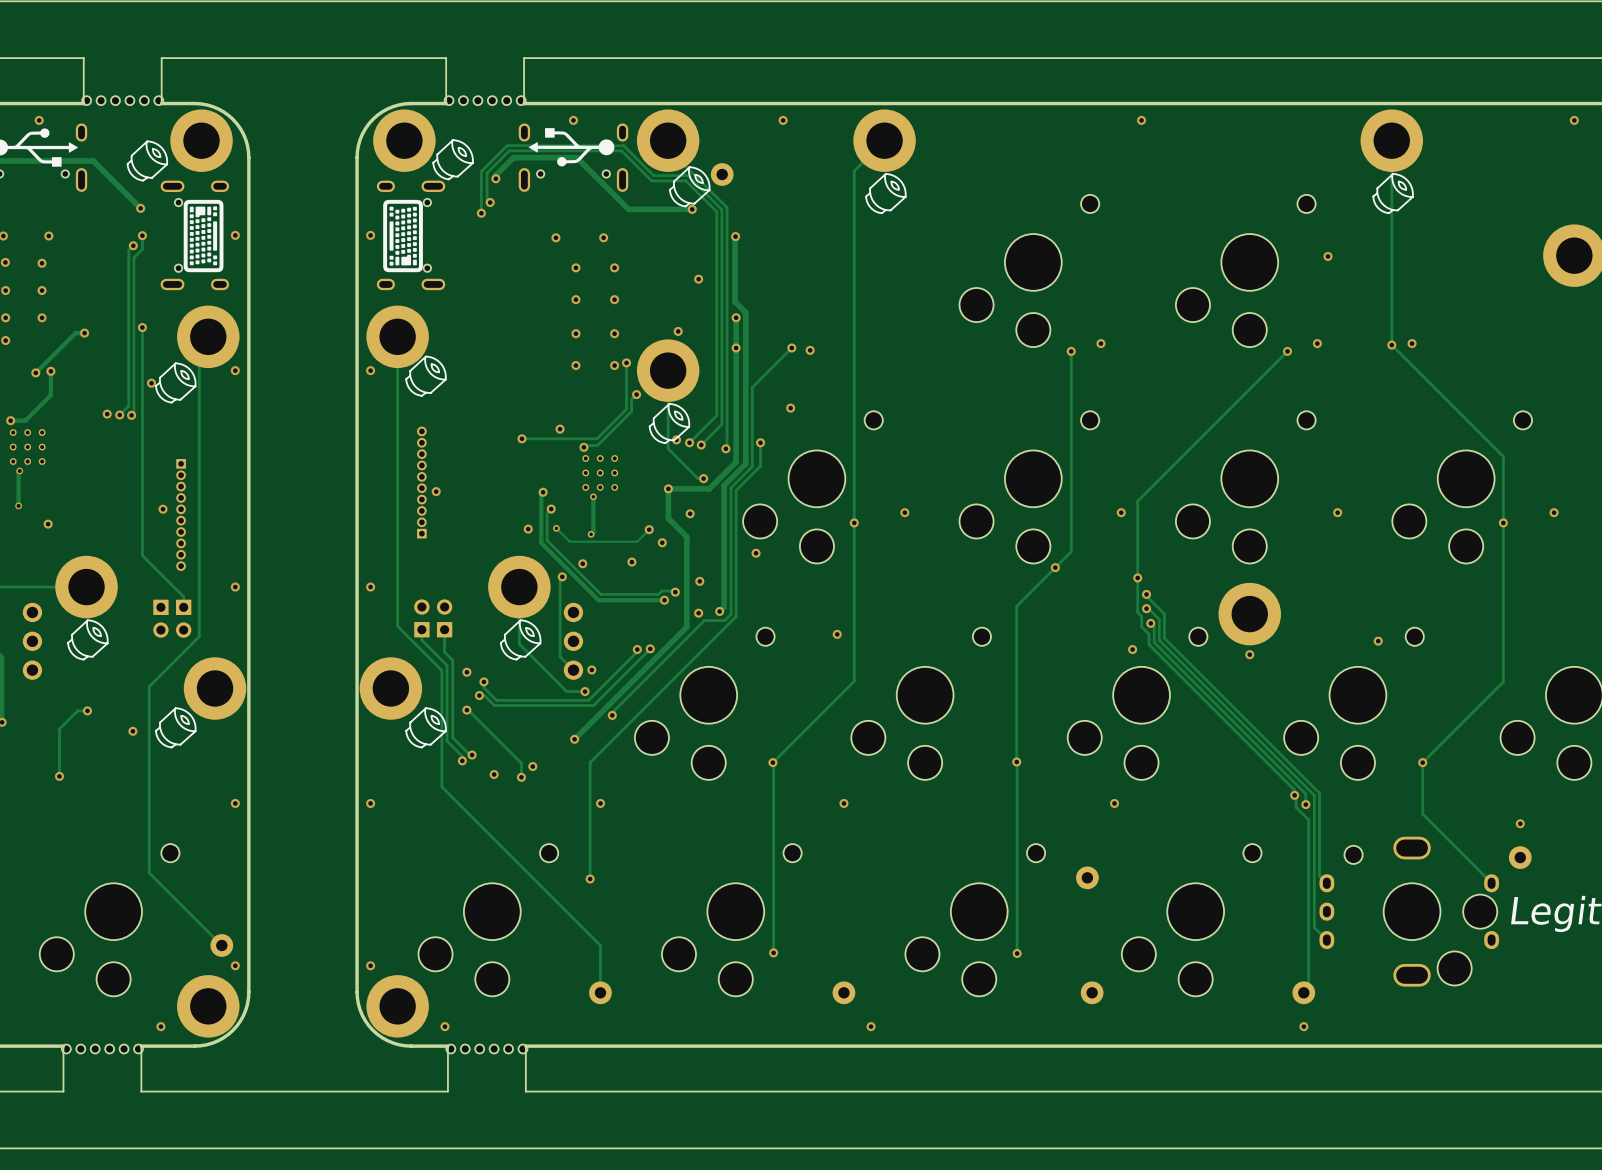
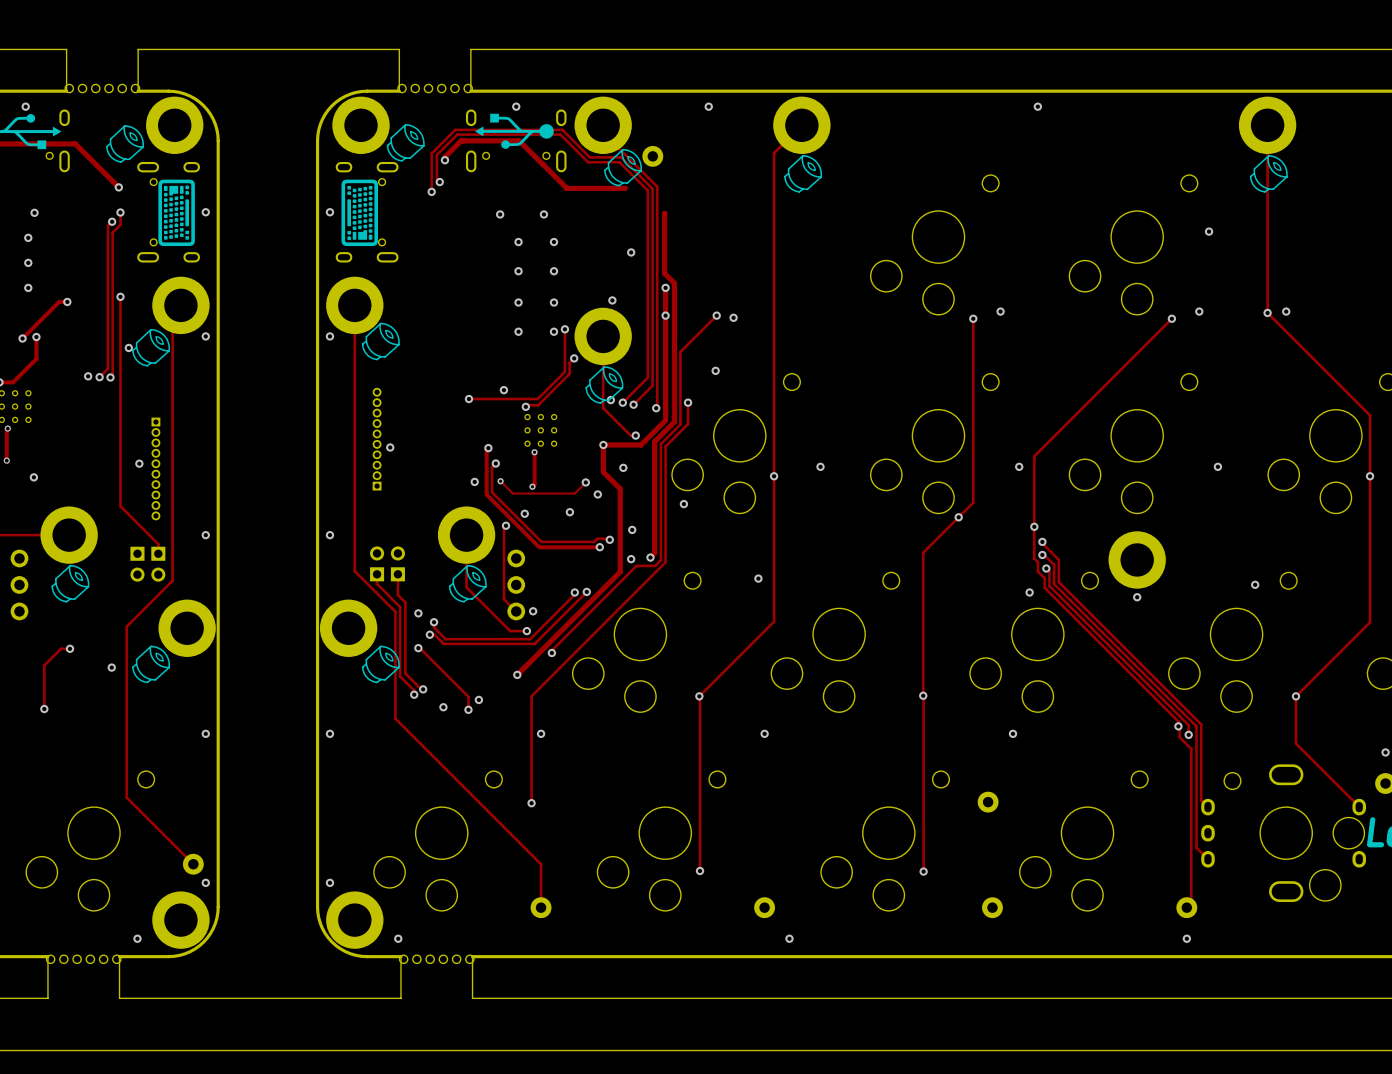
via: (692, 209) -> none
via: (735, 236) -> none

